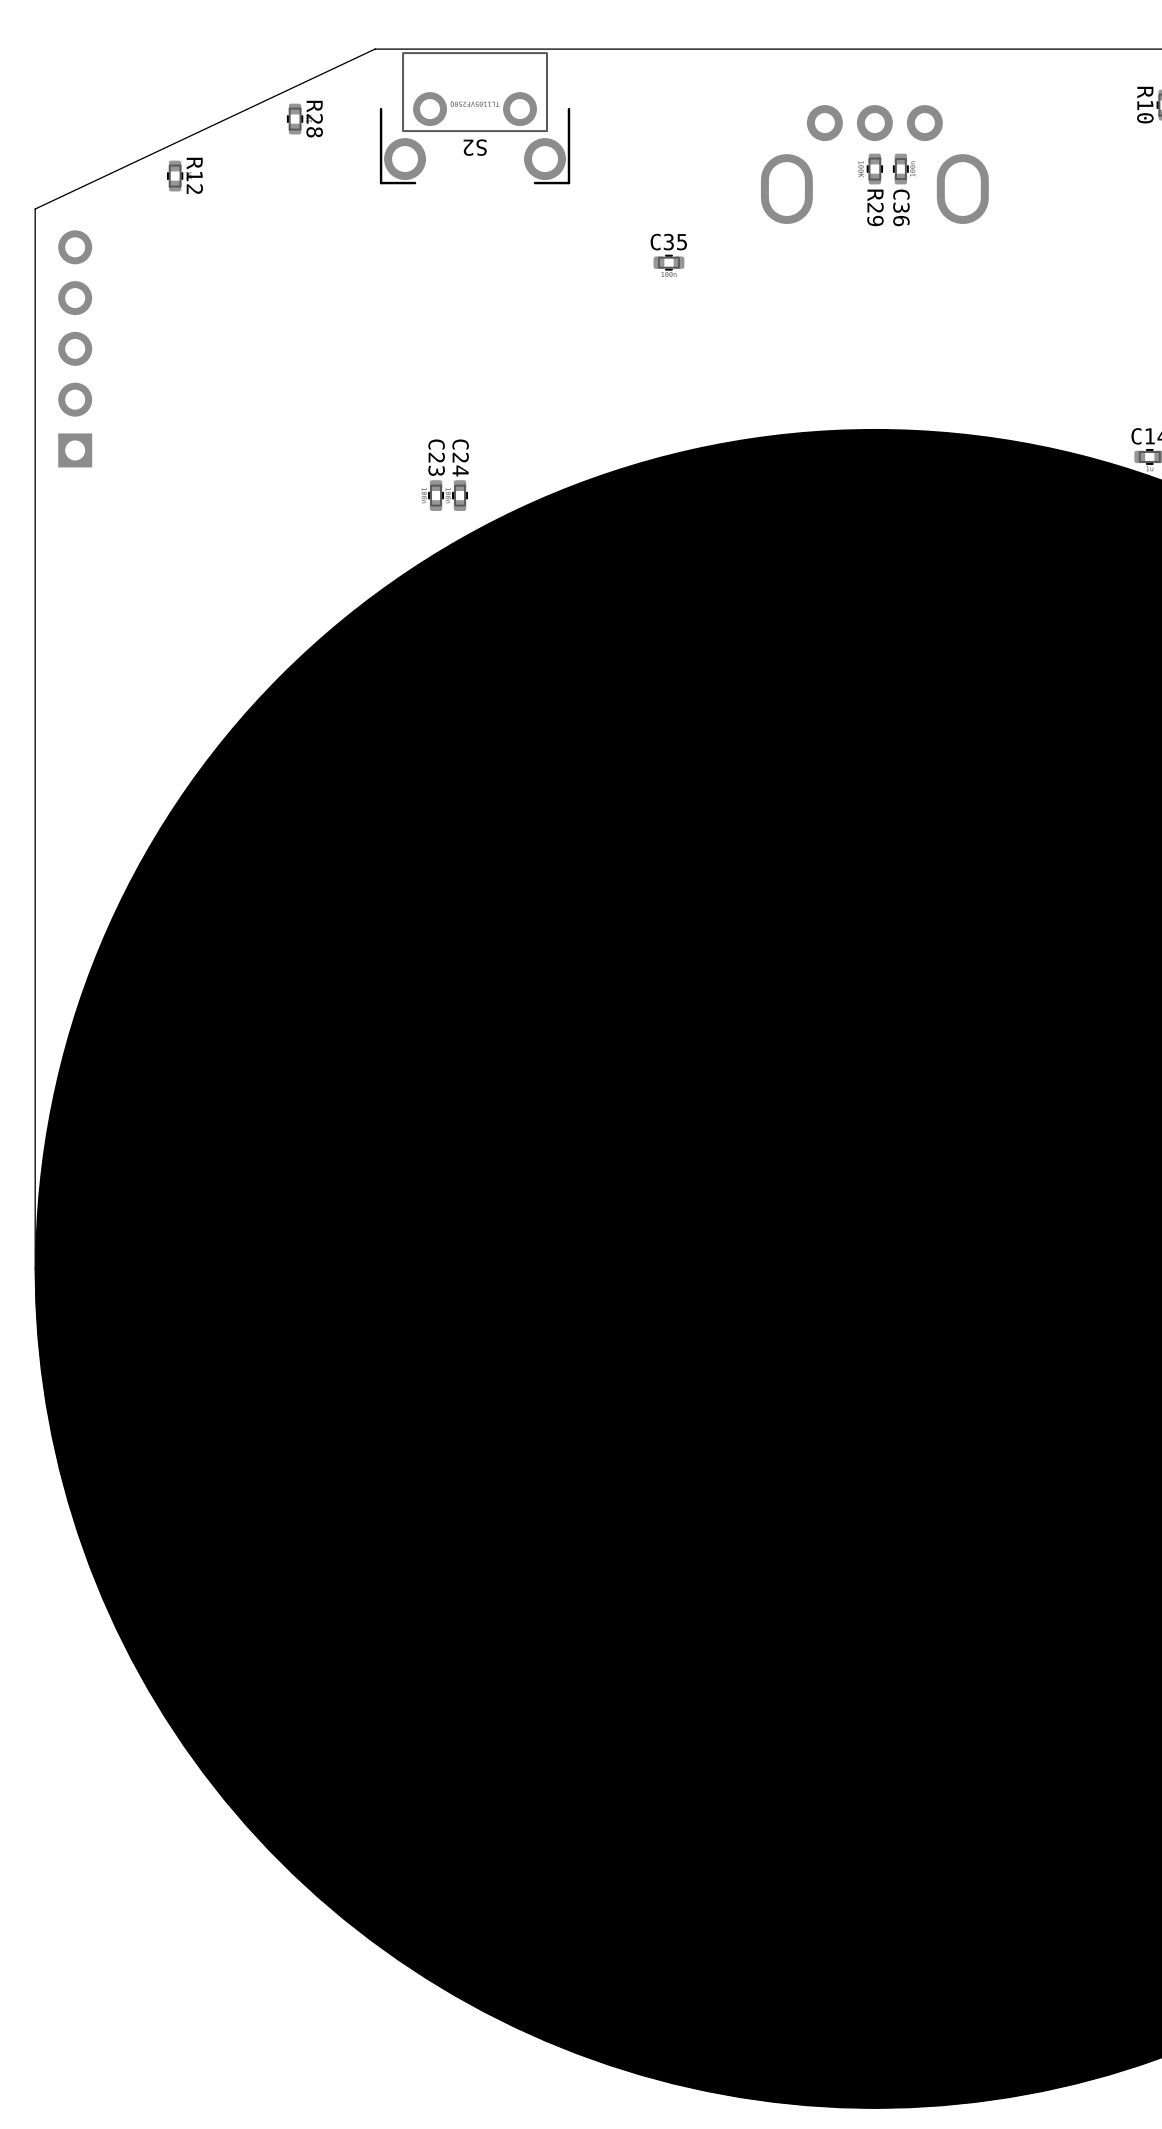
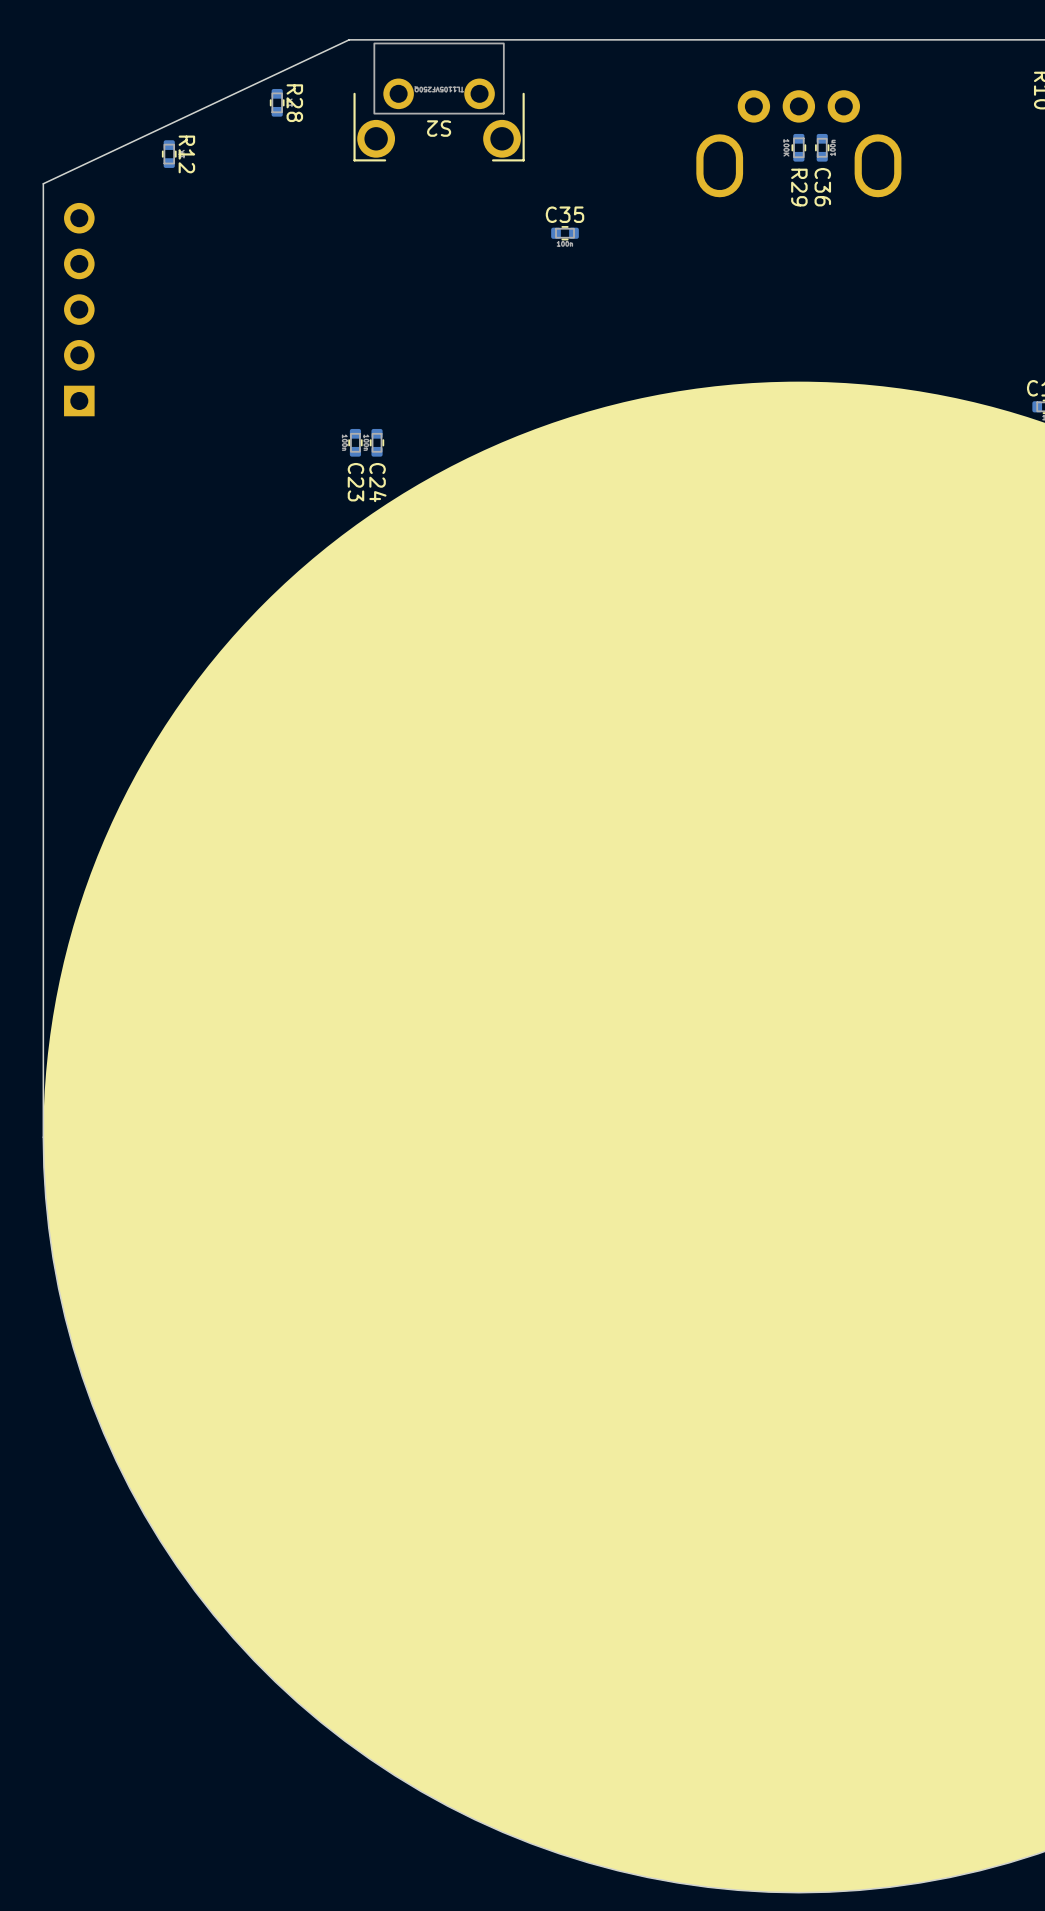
C35 position: (668, 262) -> (565, 233)
C23 name position: C23 (436, 457) -> C23 (355, 482)
C24 name position: C24 (460, 458) -> C24 (377, 482)
C23 position: (436, 495) -> (355, 442)
C24 position: (460, 495) -> (377, 442)

